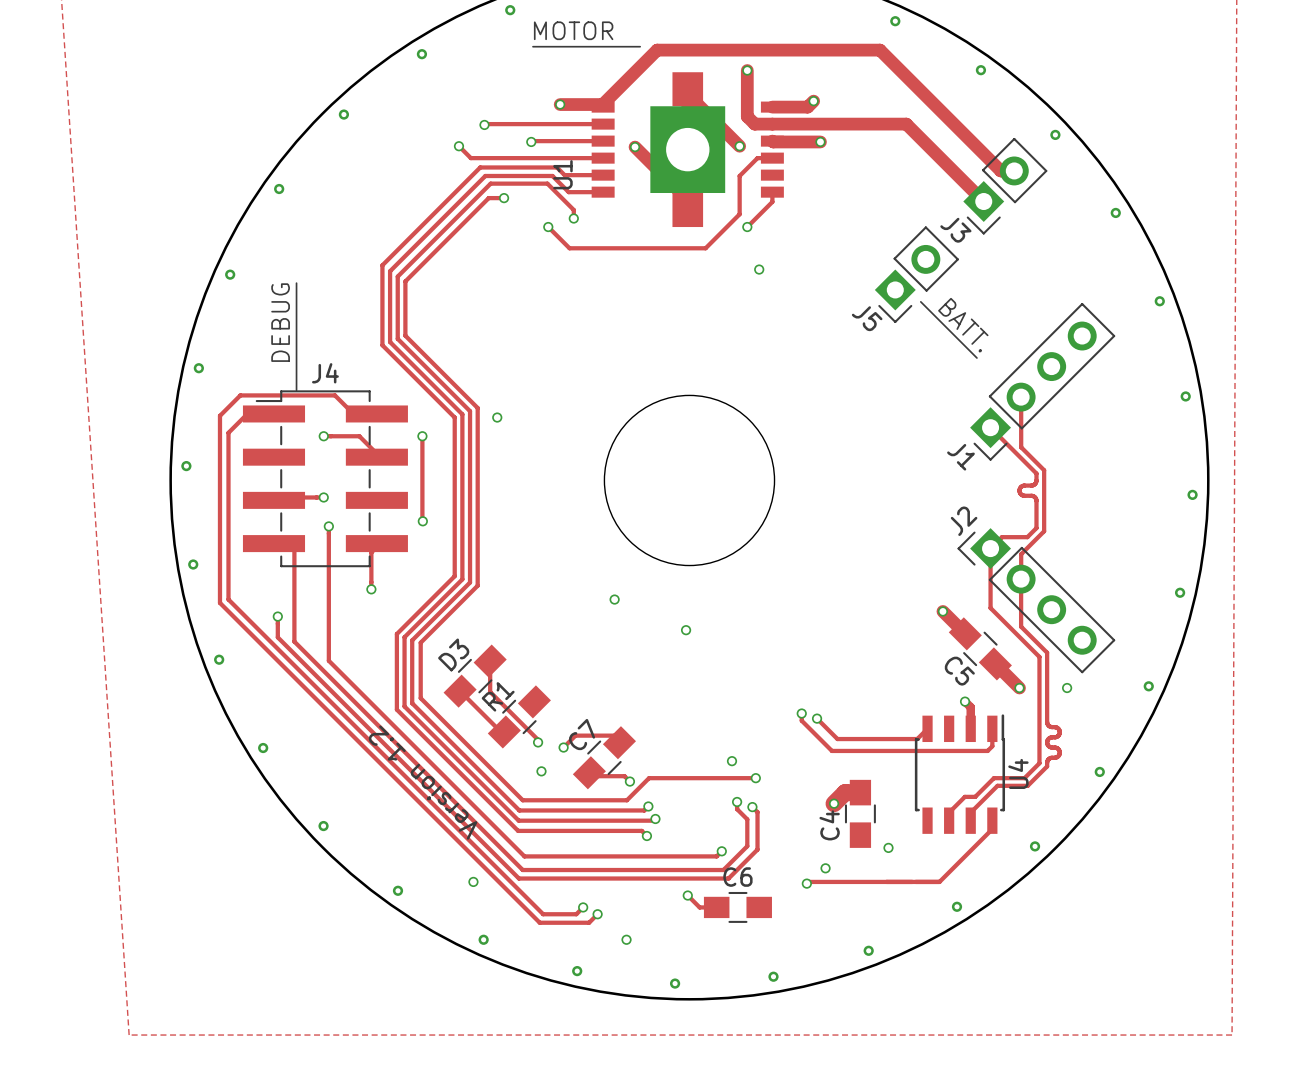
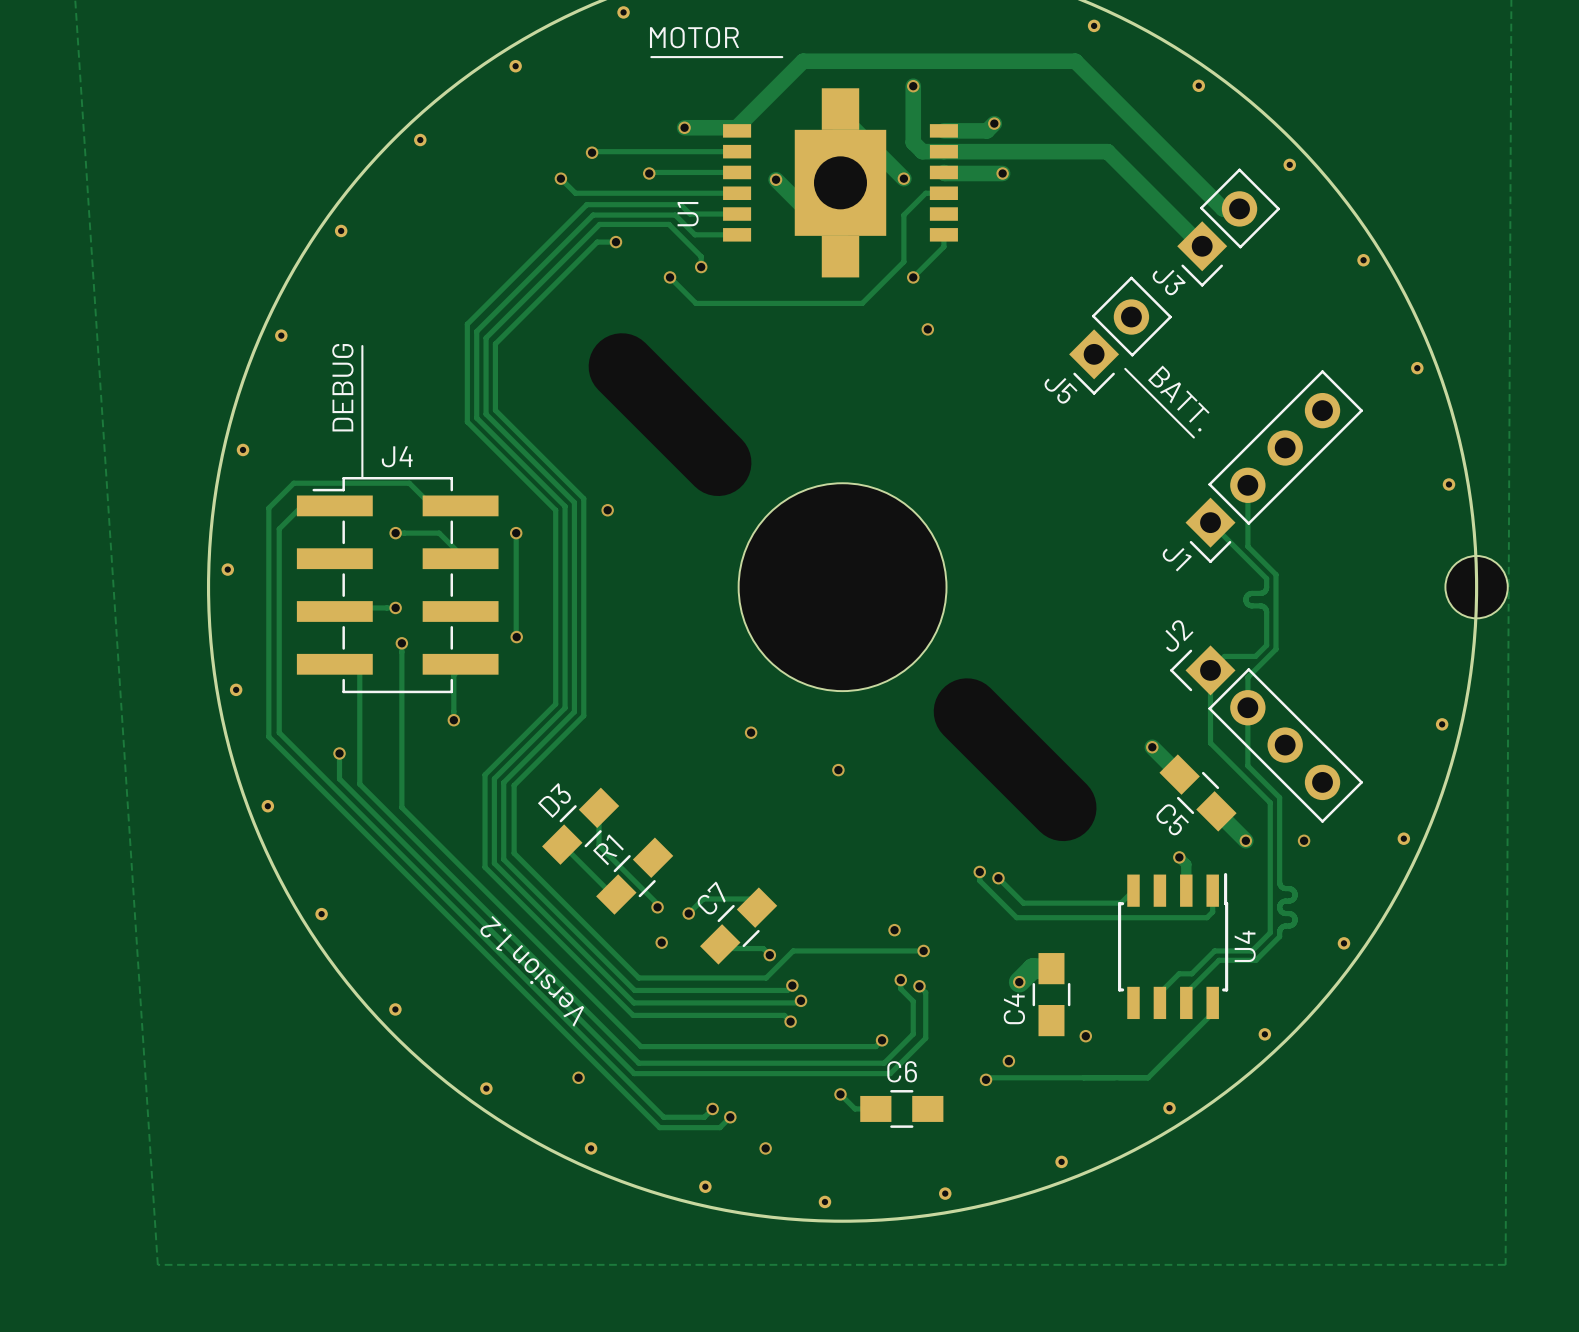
part: none -> (1476, 587)
part: (1192, 494) -> none

